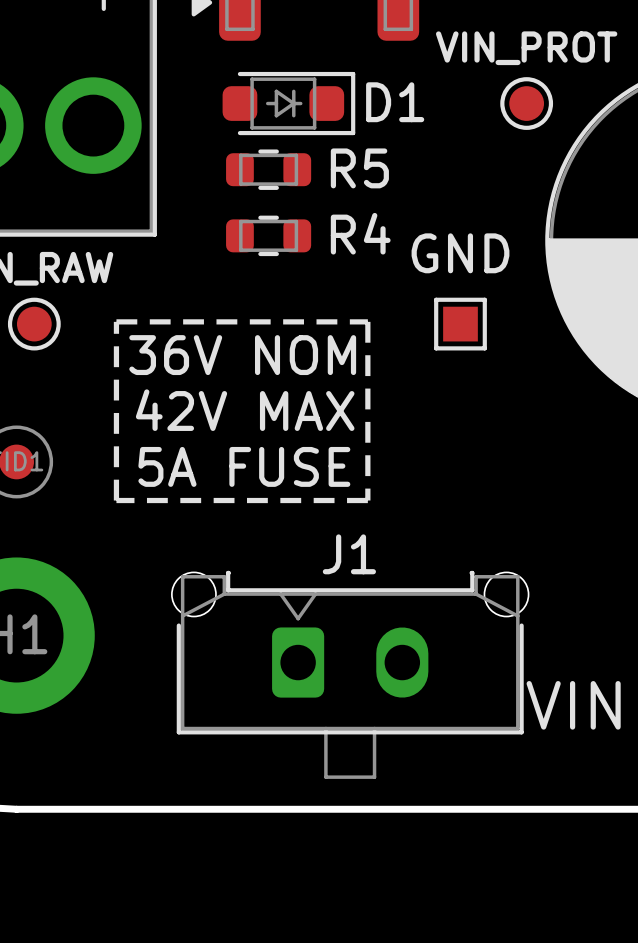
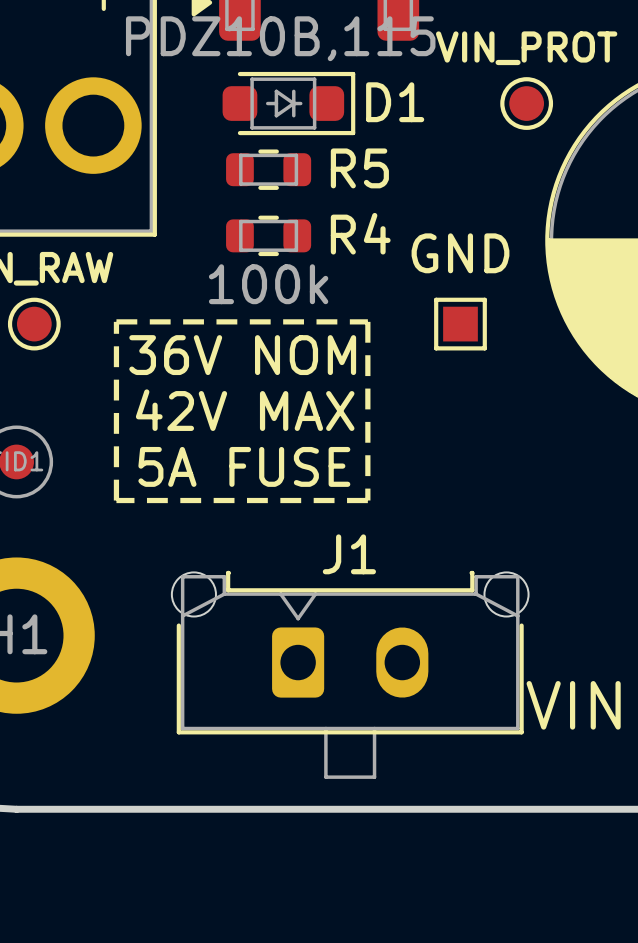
D1 value: none -> PDZ10B,115 (280, 38)
R4 value: none -> 100k (268, 284)

